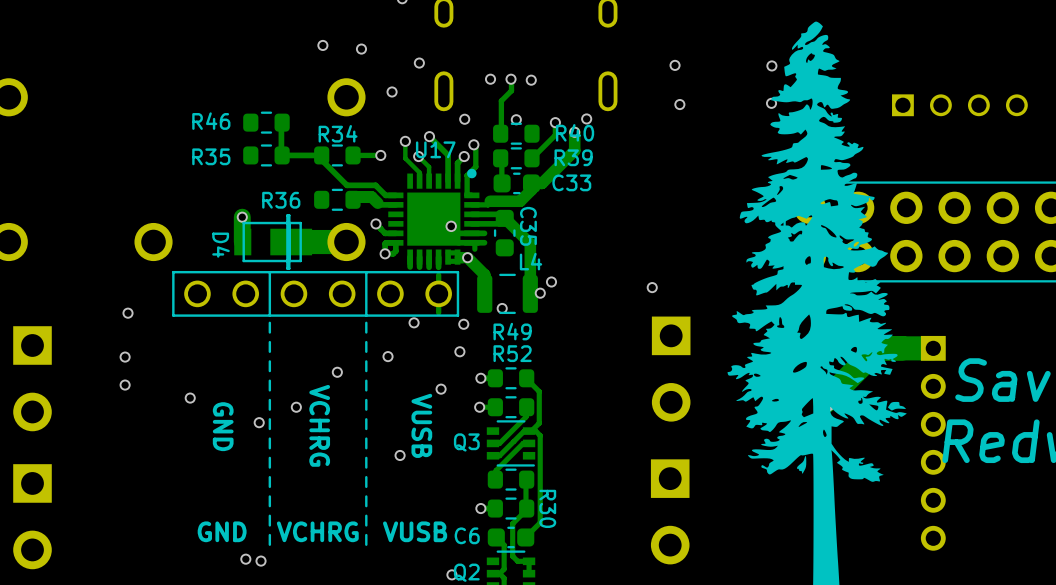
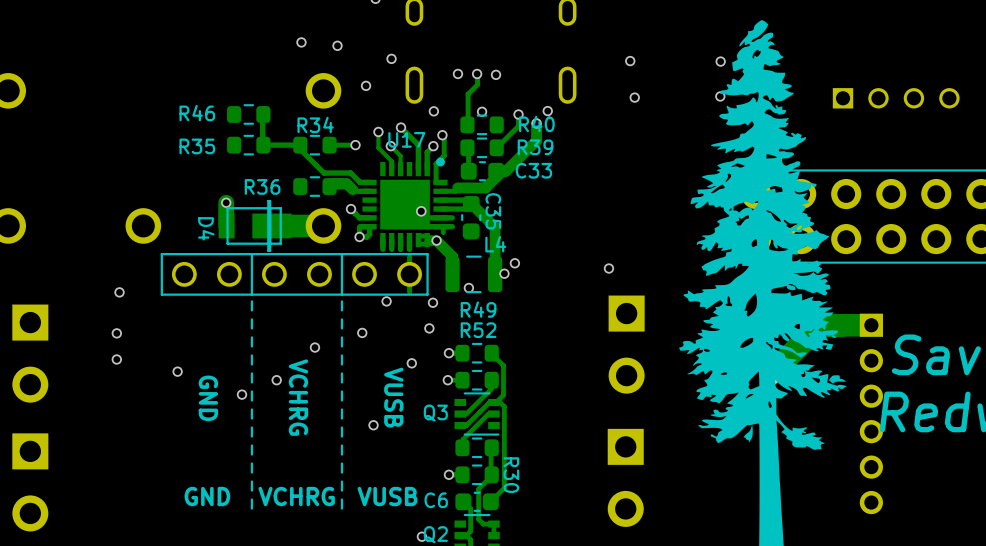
via: (245, 559) -> none
via: (261, 561) -> none

